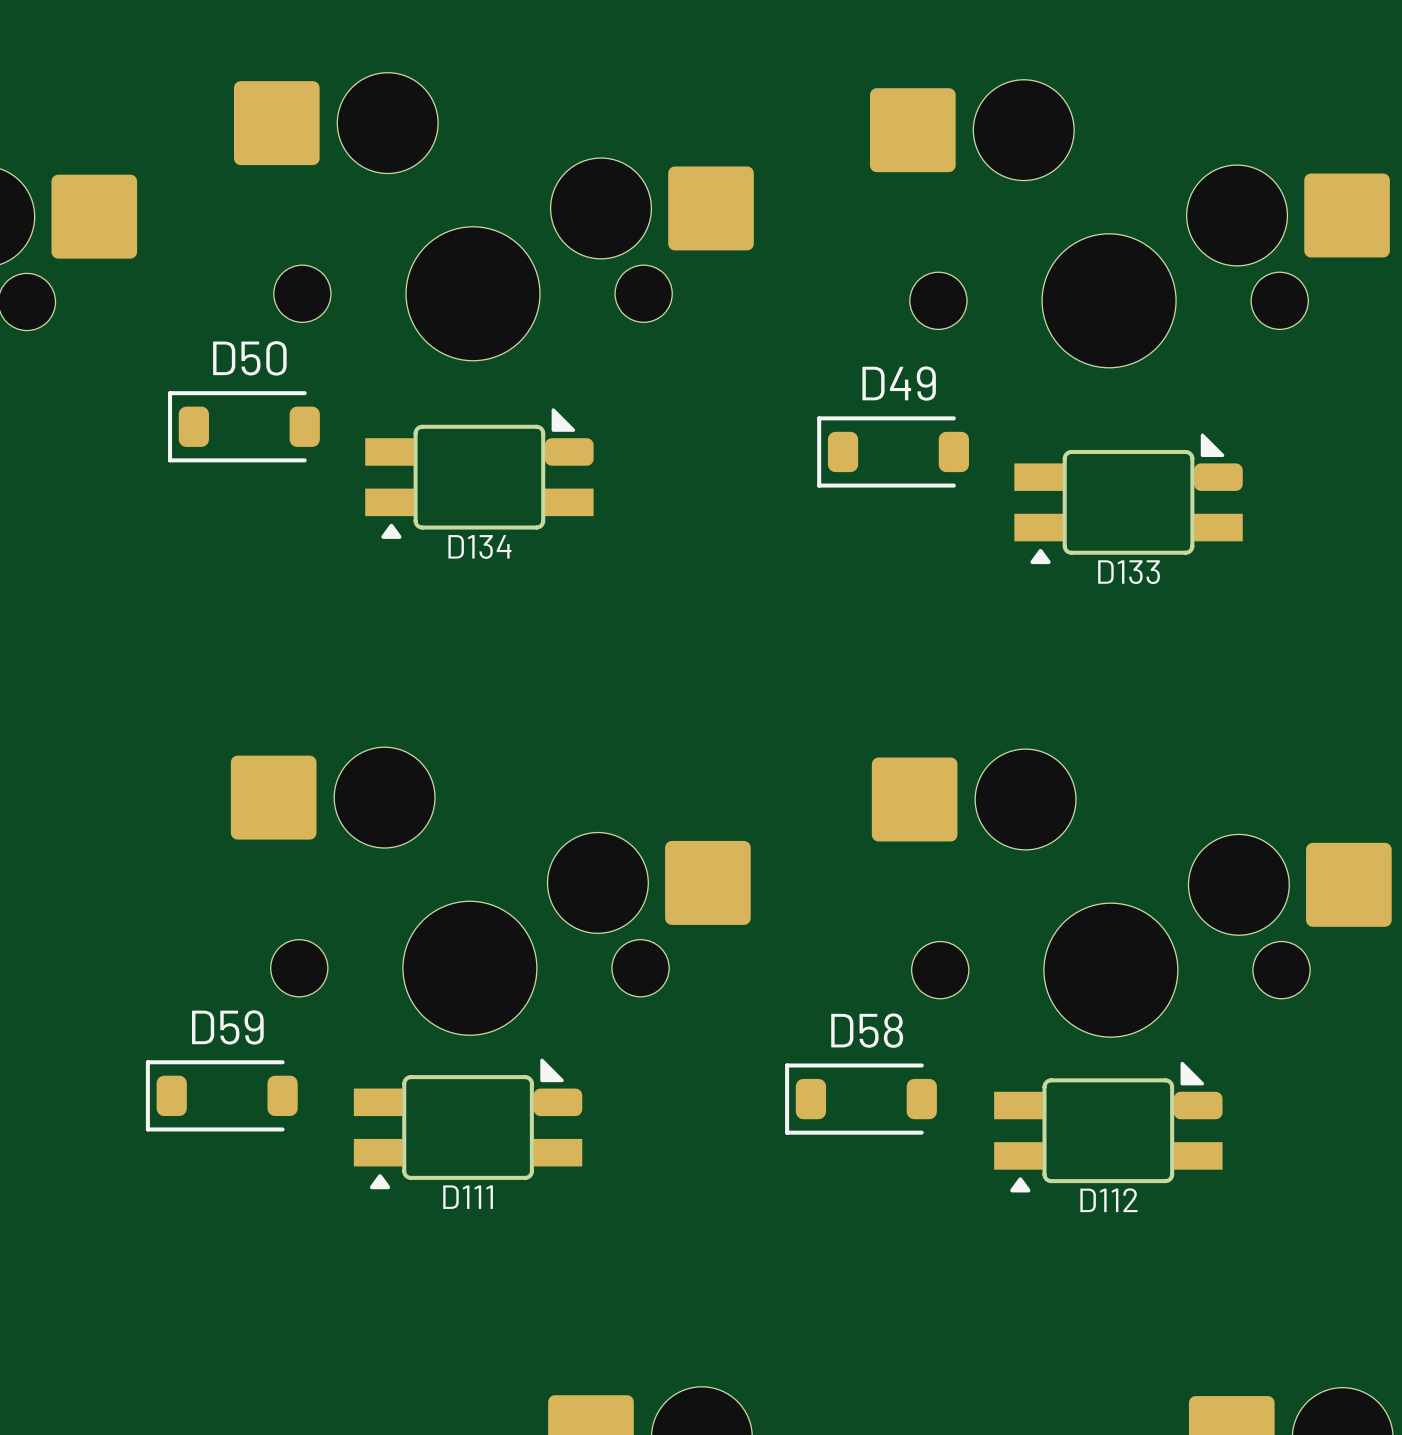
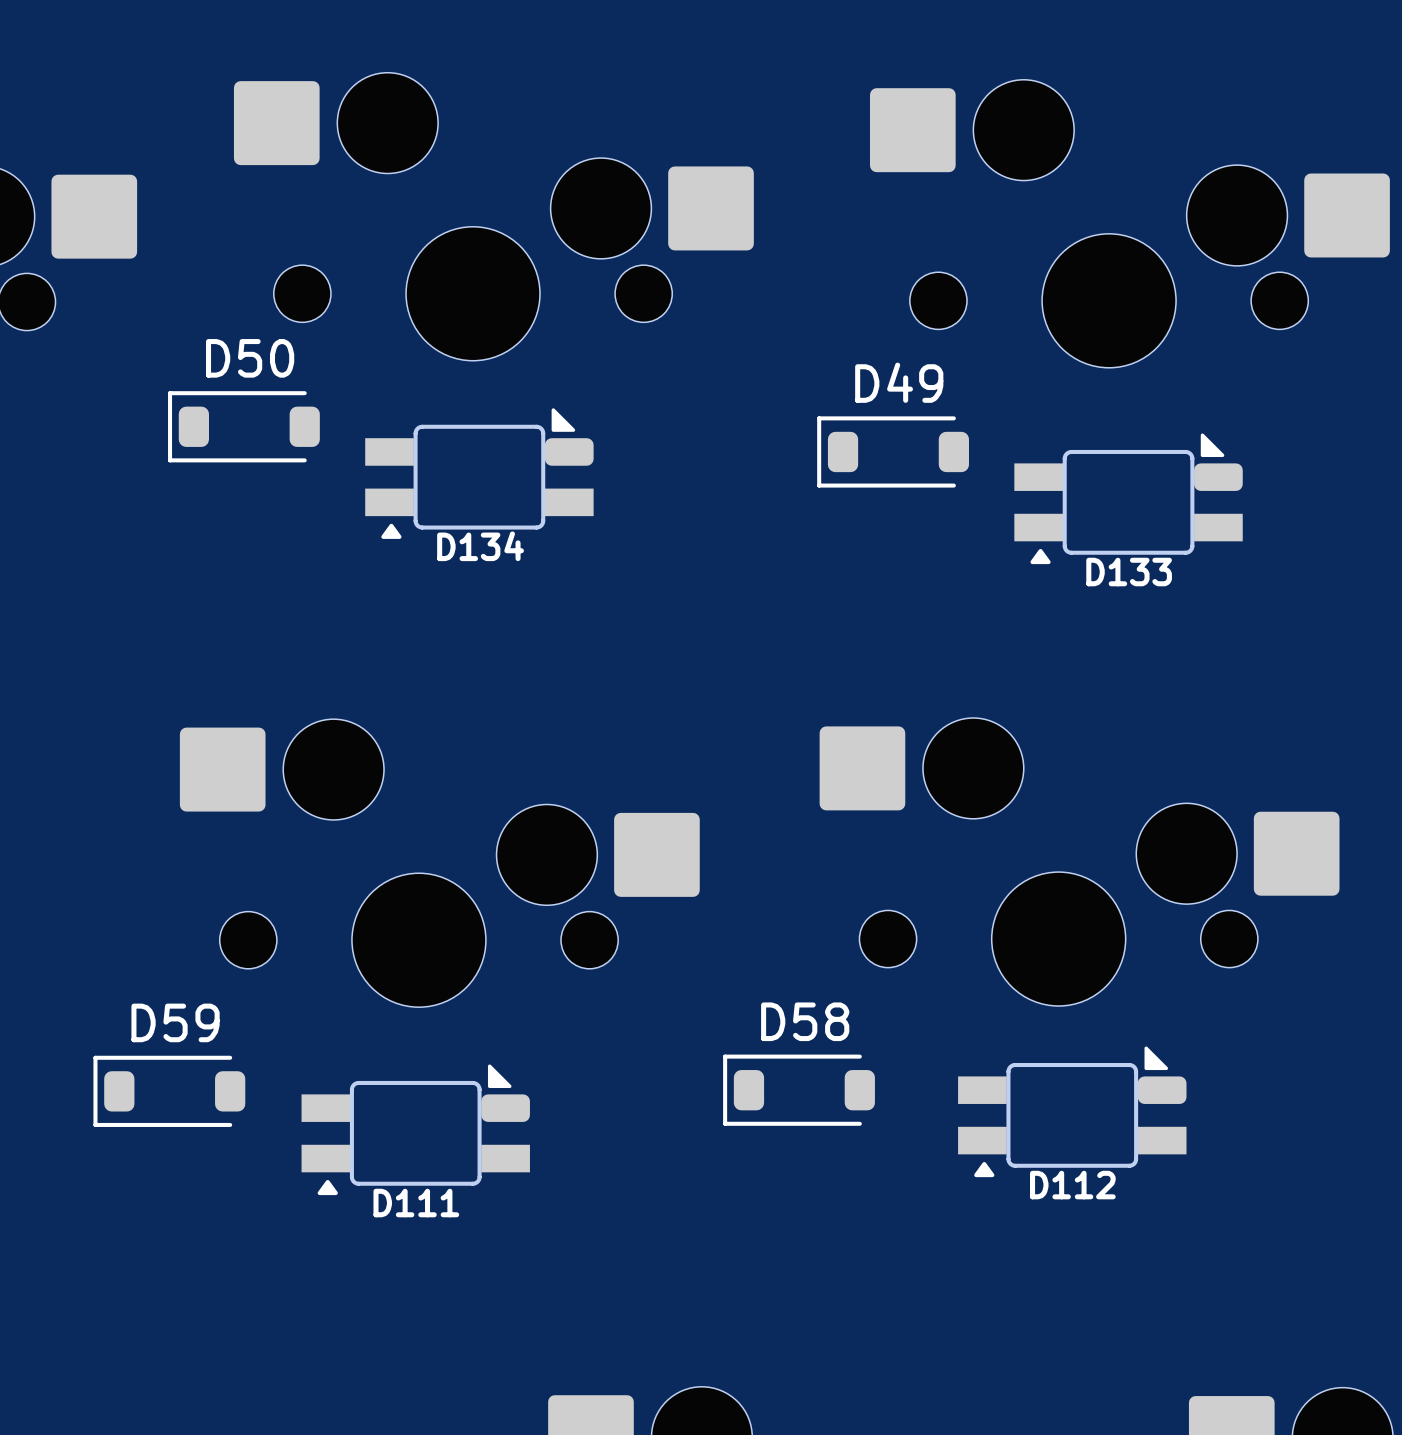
part position: (490, 891) -> (439, 863)
part position: (1131, 893) -> (1079, 862)
D59 position: (221, 1095) -> (169, 1091)
D58 position: (860, 1099) -> (799, 1090)
D111 position: (468, 1123) -> (415, 1129)
D112 position: (1108, 1127) -> (1072, 1111)

